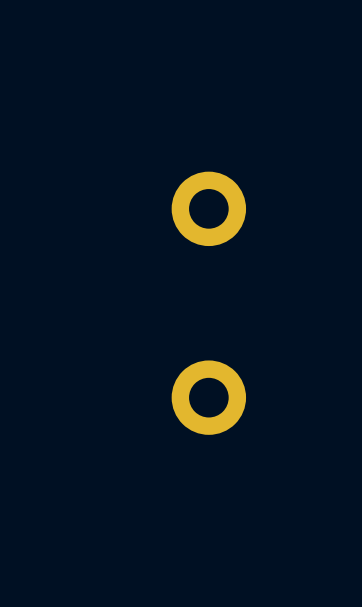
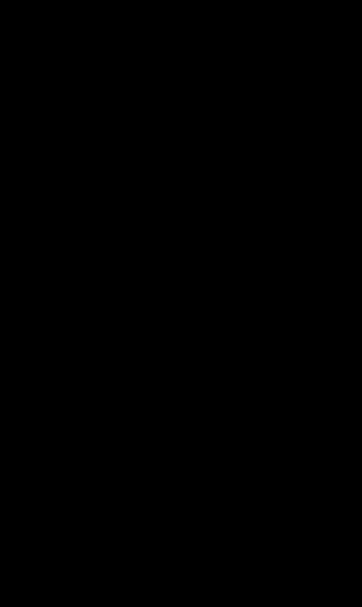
part: (208, 303) -> none

